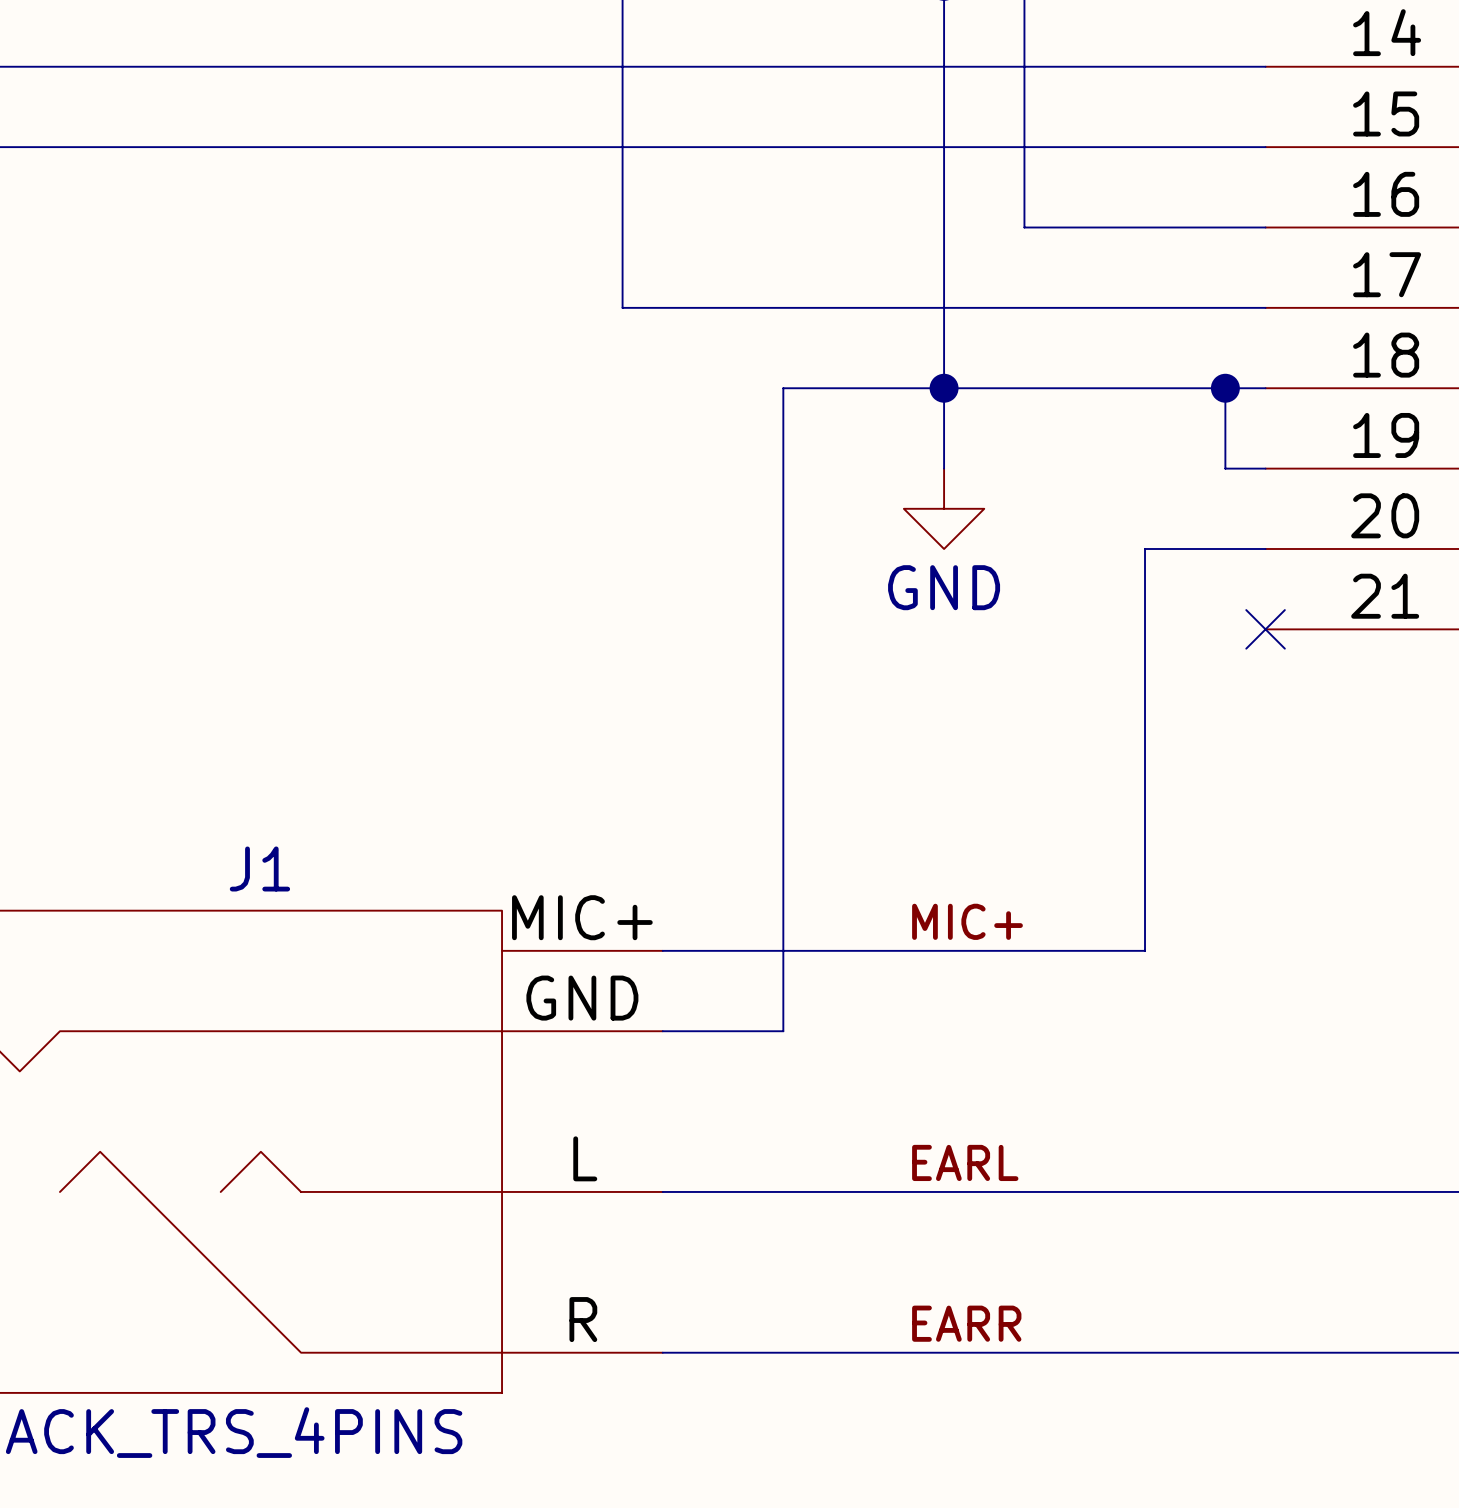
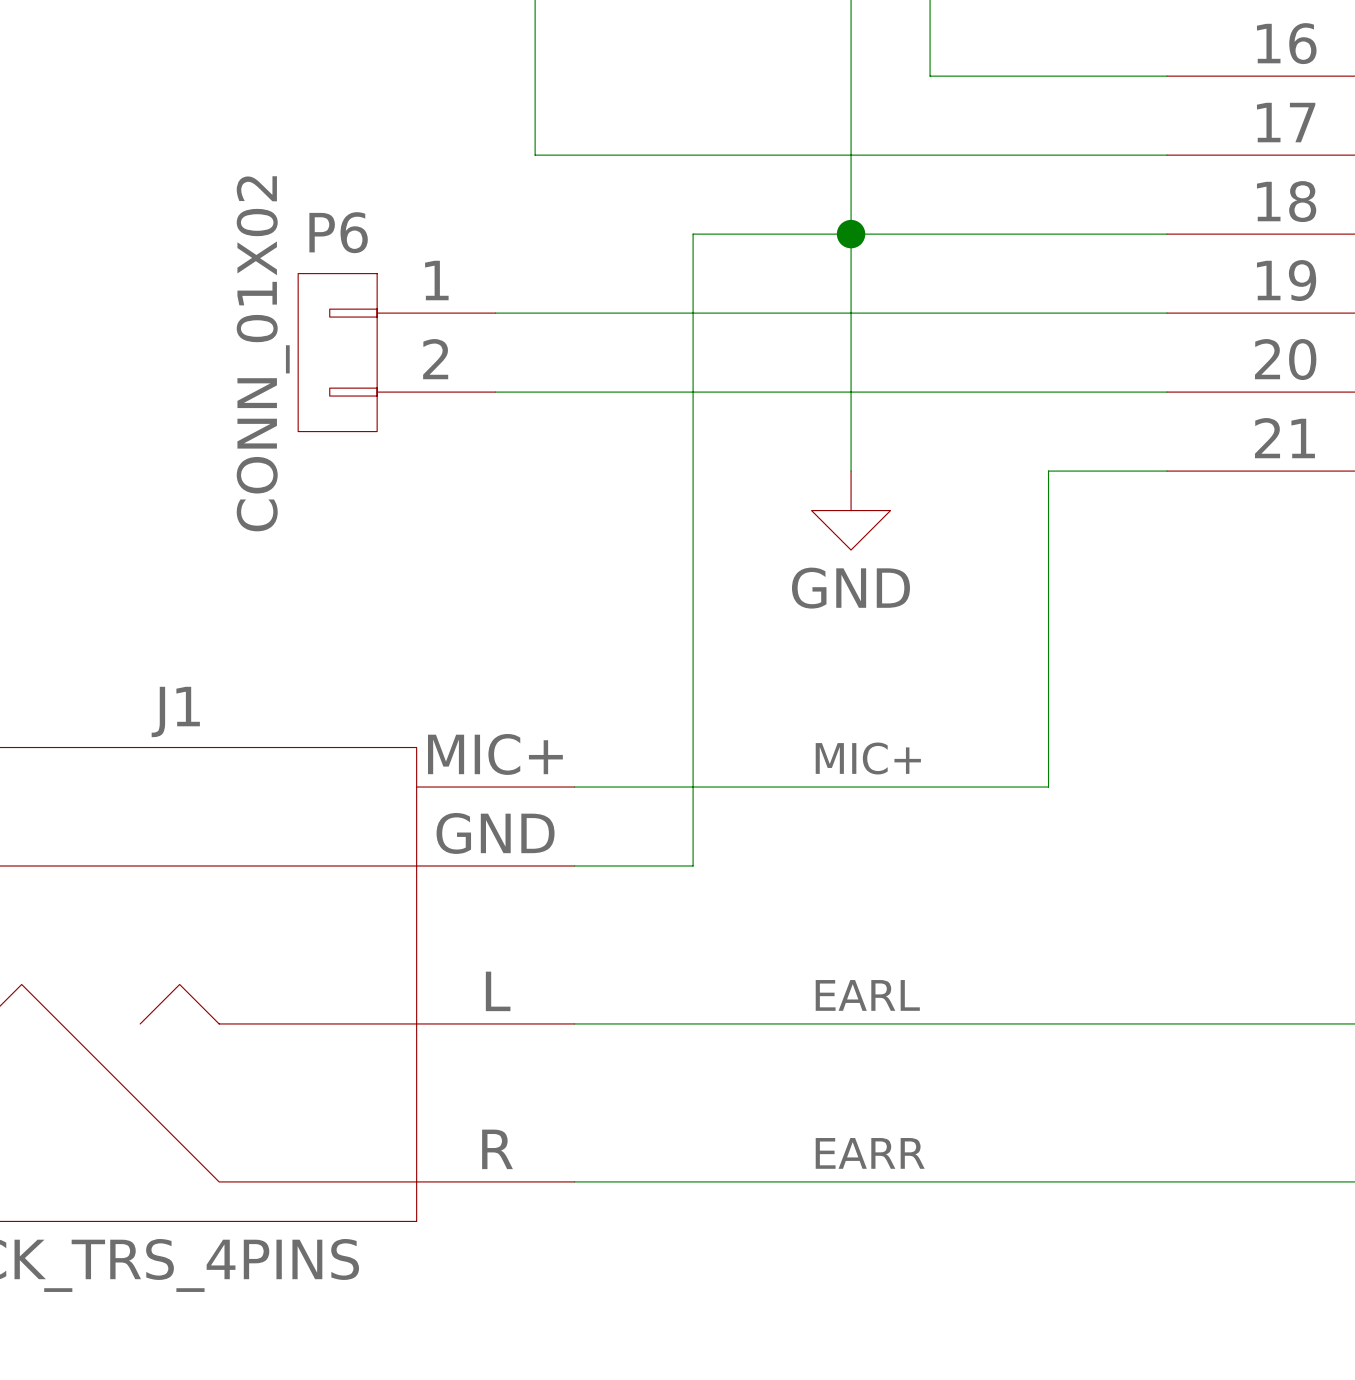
wire: (1225, 388) (1225, 468) -> (495, 313) (1127, 313)
junction: (1225, 388) -> none
wire: none -> (851, 313) (851, 471)
P6: none -> CONN_01X02 (396, 352)
power symbol position: GND (944, 508) -> GND (851, 510)
wire: none -> (495, 392) (1048, 392)
wire: (1145, 548) (1145, 629) -> (1167, 471) (1048, 471)
no-connect mark: (1265, 629) -> none

